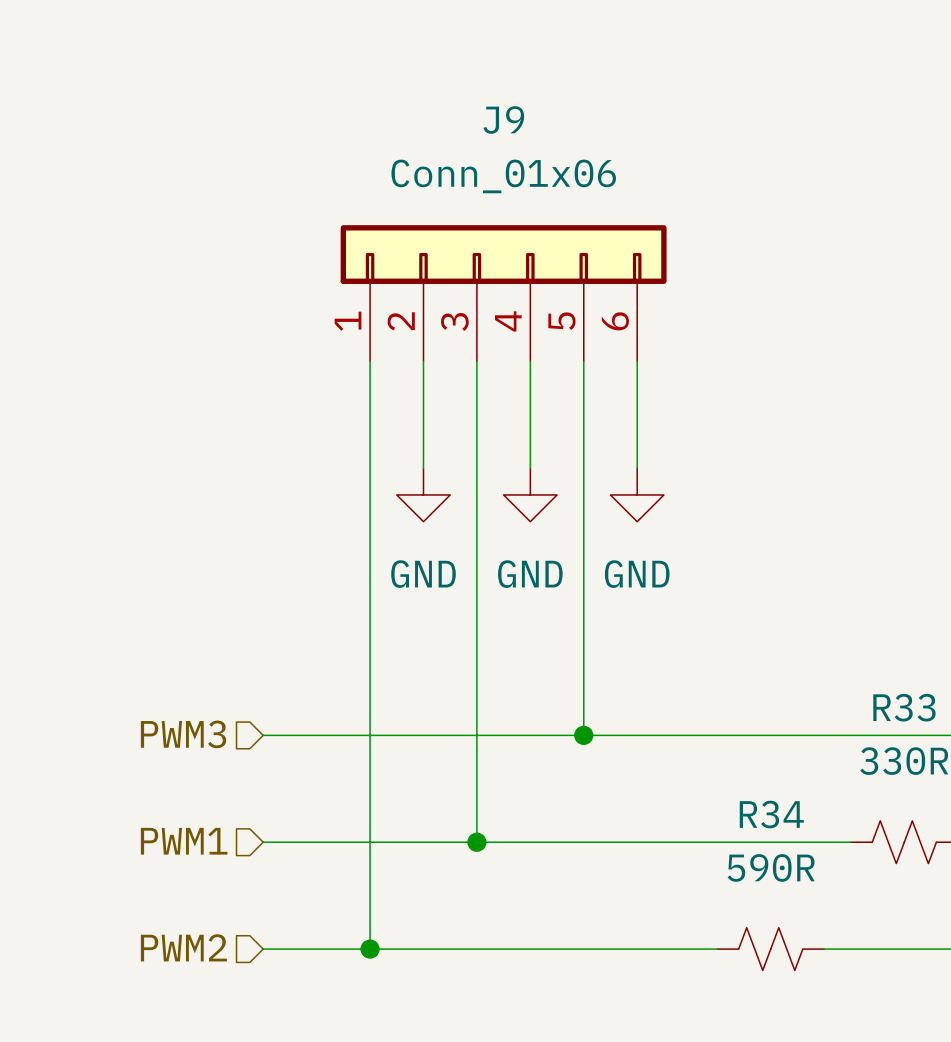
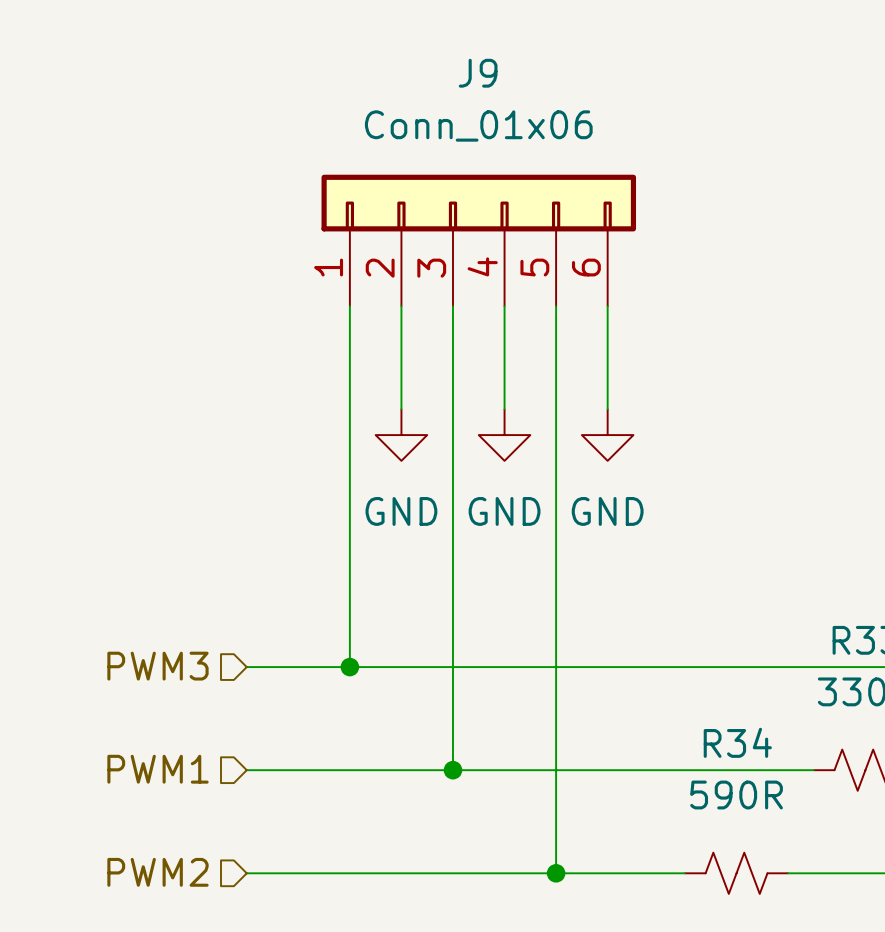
wire: (370, 735) (370, 949) -> (556, 667) (556, 873)
junction: none -> (349, 667)
junction: (583, 735) -> none
junction: (370, 949) -> none
junction: none -> (556, 873)

